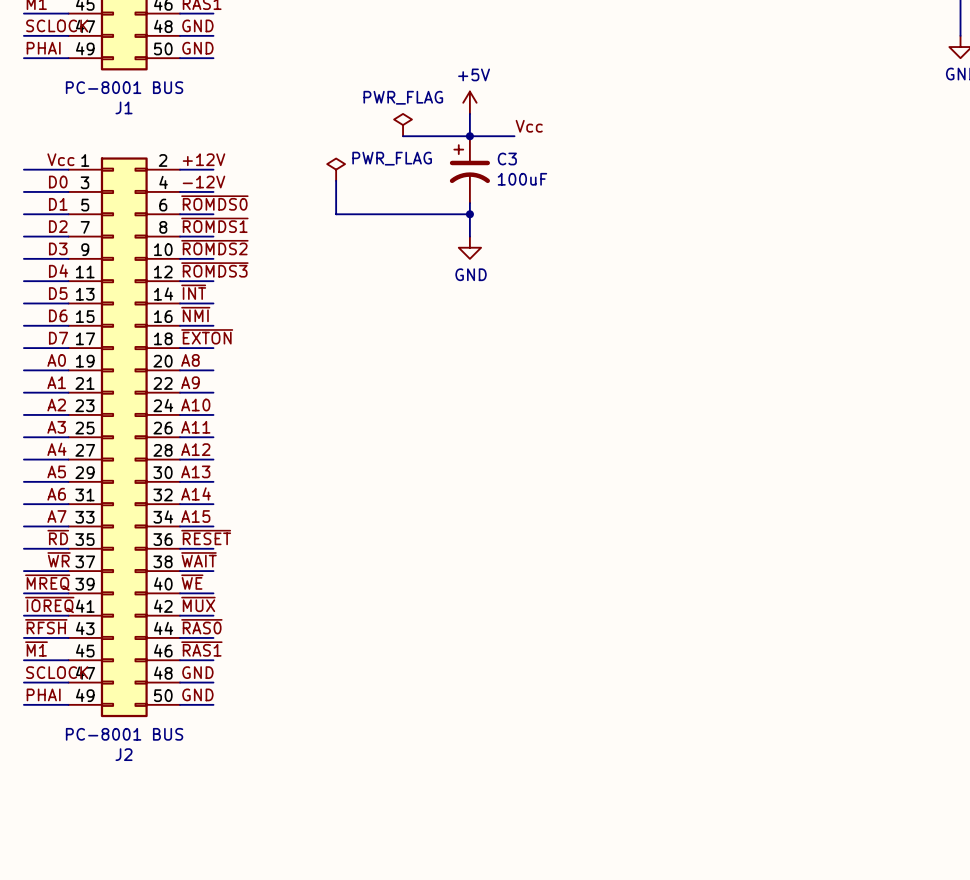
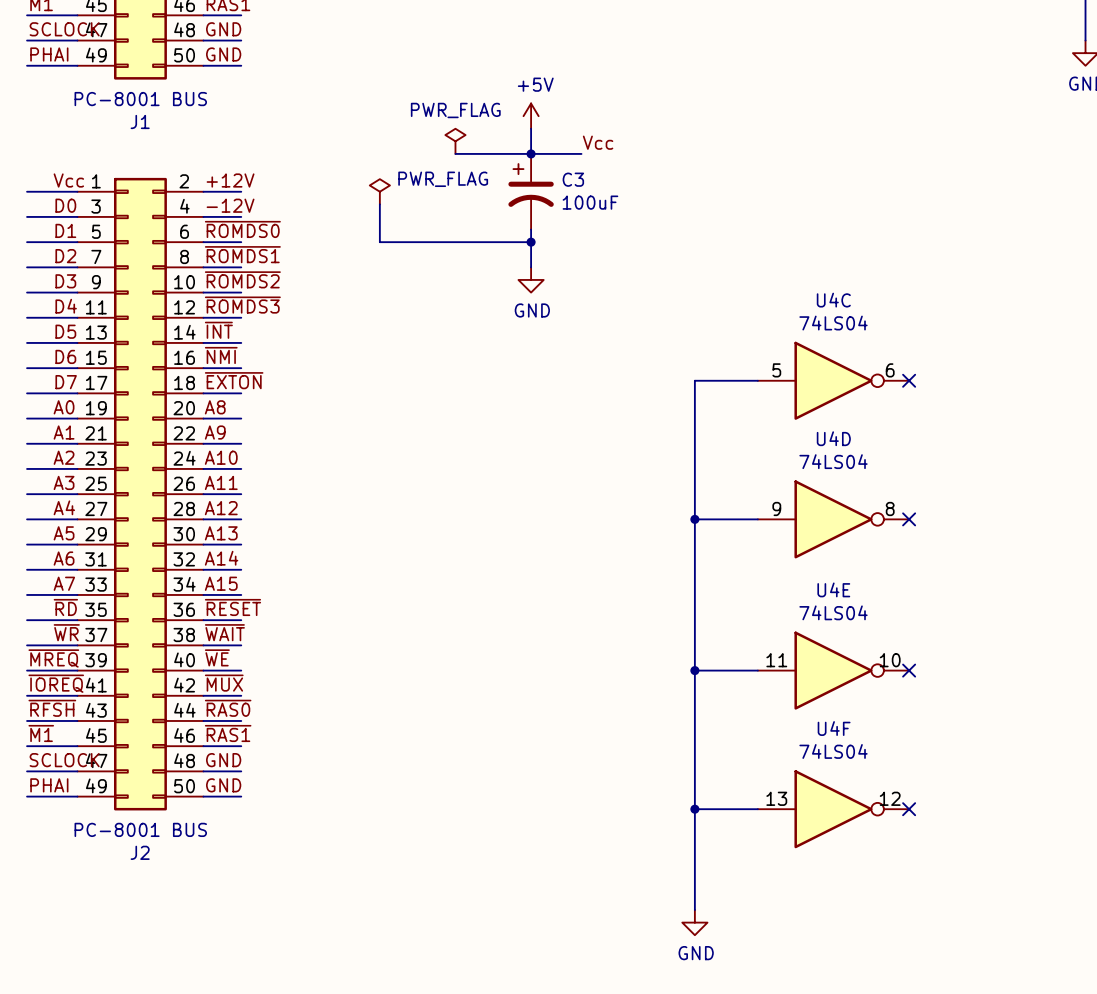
wire: none -> (757, 380) (694, 380) (694, 910)
U4C: none -> 74LS04 (833, 380)
no-connect mark: none -> (909, 380)
wire: none -> (694, 519) (757, 519)
junction: none -> (694, 519)
U4D: none -> 74LS04 (833, 519)
no-connect mark: none -> (909, 519)
wire: none -> (694, 670) (757, 670)
junction: none -> (694, 670)
U4E: none -> 74LS04 (833, 670)
no-connect mark: none -> (909, 670)
wire: none -> (694, 809) (757, 809)
junction: none -> (694, 809)
U4F: none -> 74LS04 (833, 809)
no-connect mark: none -> (909, 809)
power symbol: none -> GND (694, 922)

